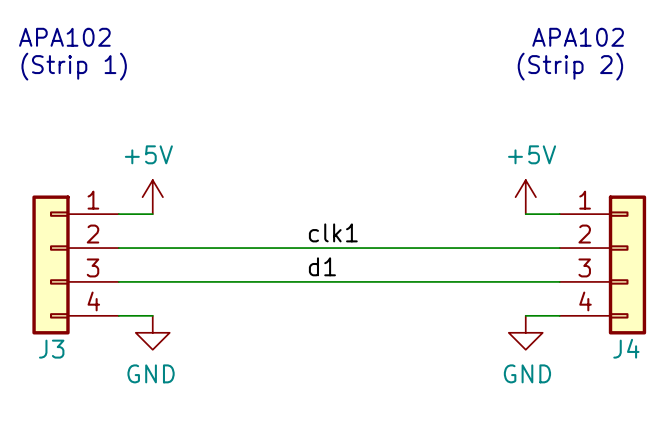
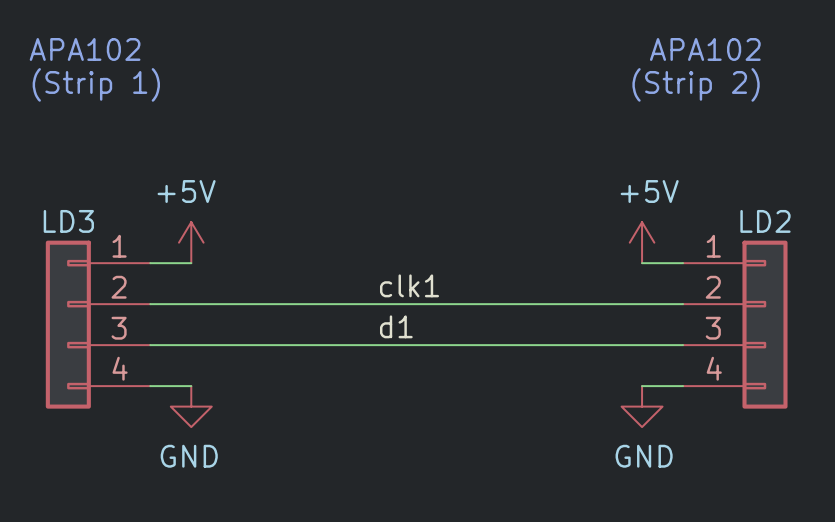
J4 name: J4 (626, 348) -> LD2 (765, 221)
J3 name: J3 (51, 349) -> LD3 (68, 221)

